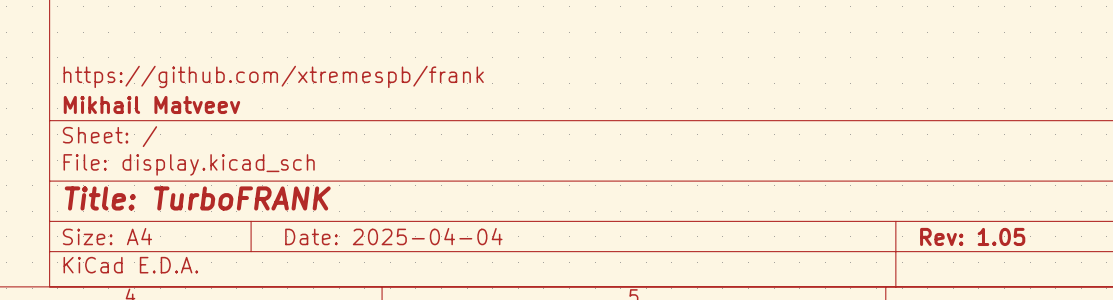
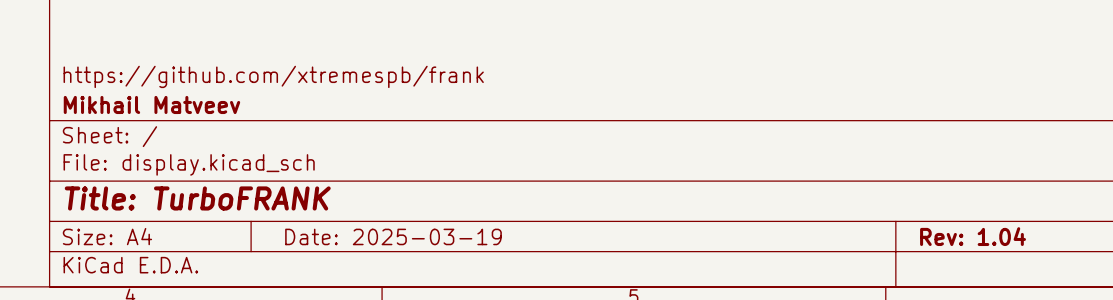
title block: Date: 2025-04-04 (393, 236) -> Date: 2025-03-19 (393, 236)
title block: Rev: 1.05 (972, 236) -> Rev: 1.04 (973, 236)

